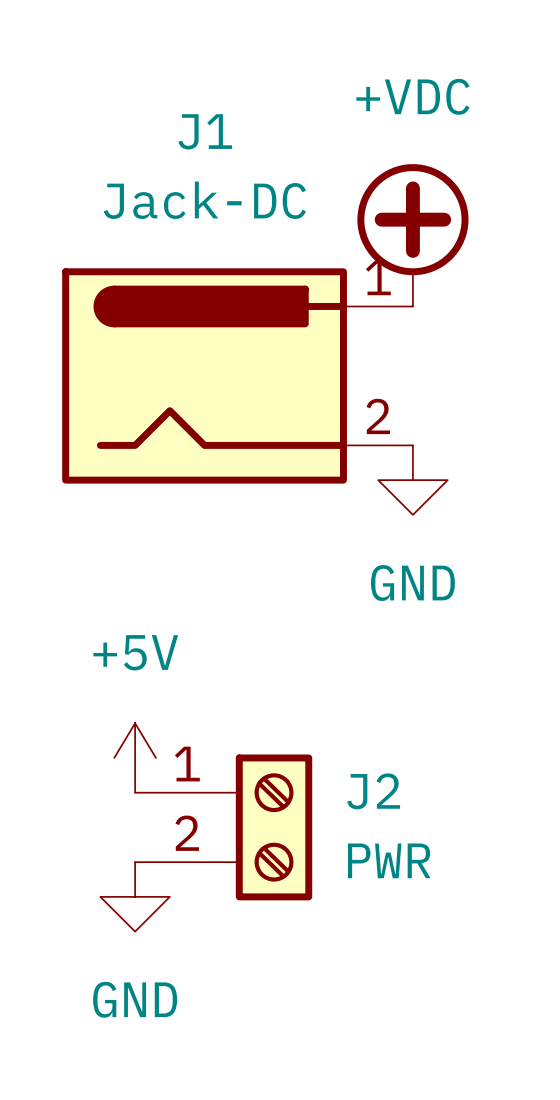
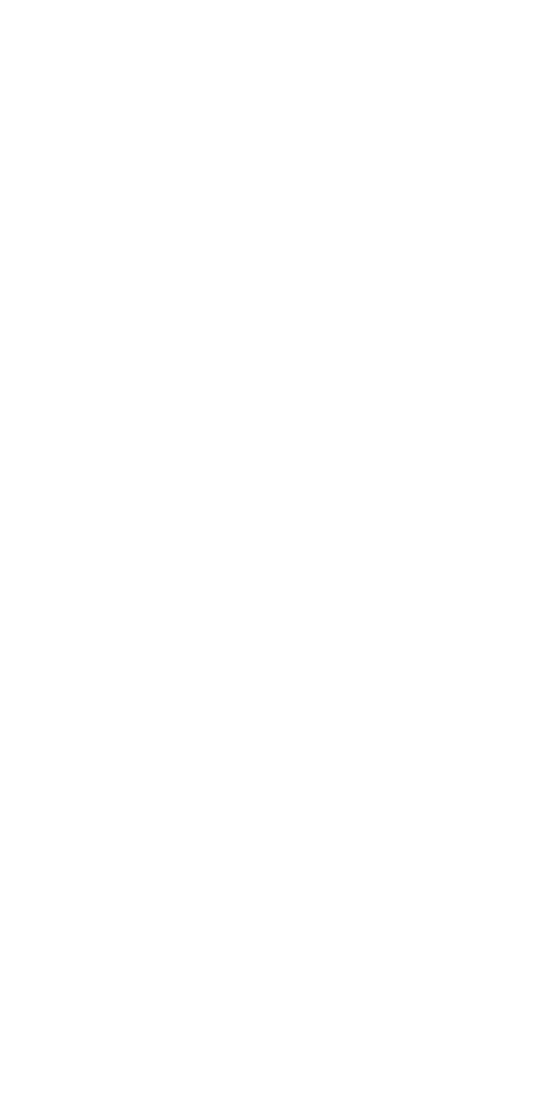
power symbol: +VDC (412, 235) -> none
J1: Jack-DC (237, 375) -> none
power symbol: GND (412, 480) -> none
power symbol: +5V (135, 757) -> none
J2: PWR (223, 827) -> none
power symbol: GND (135, 896) -> none

